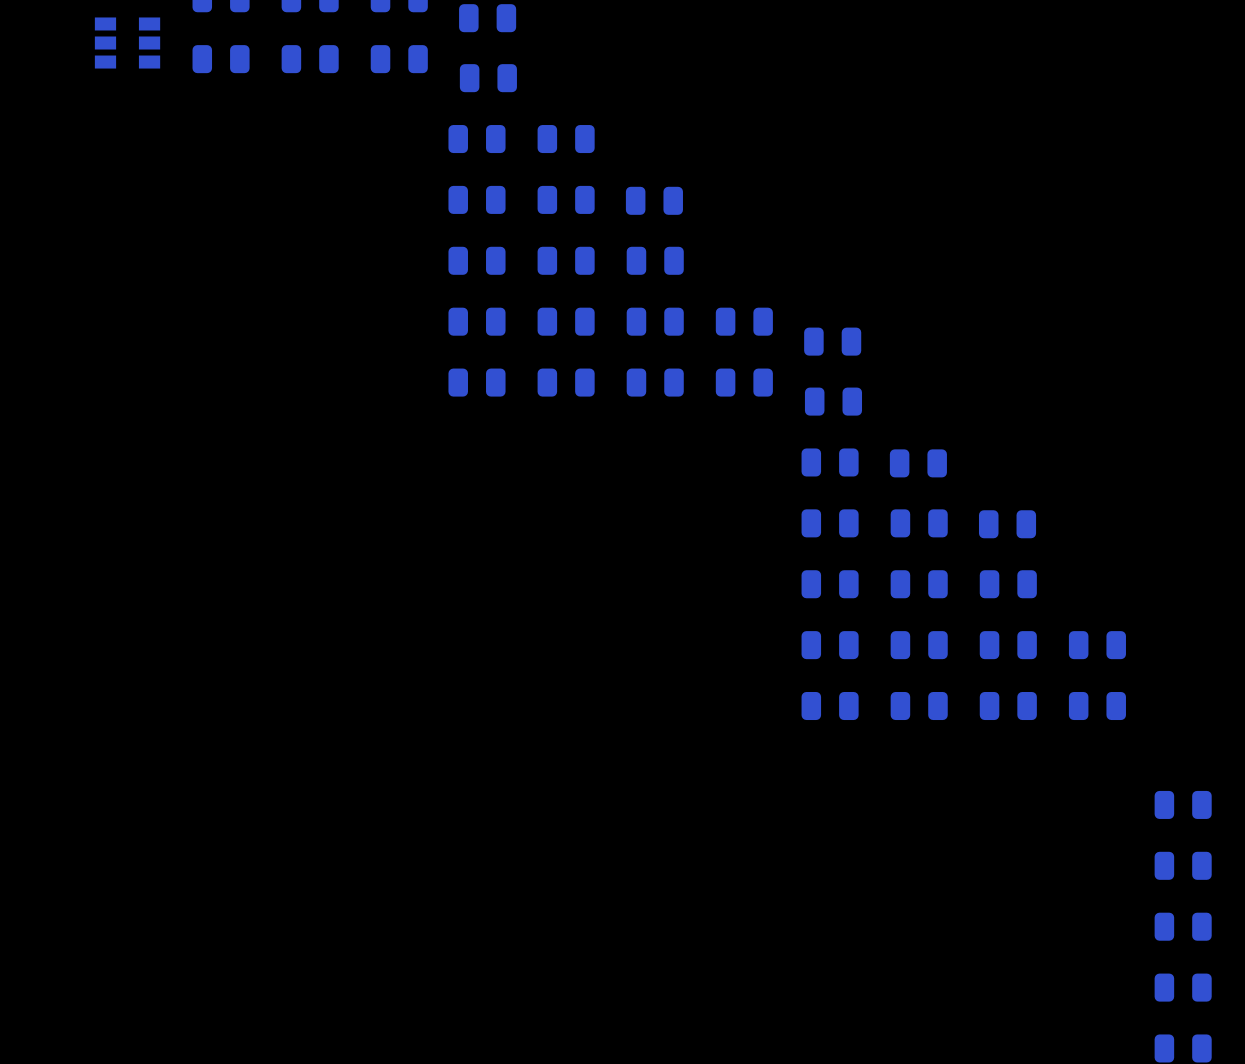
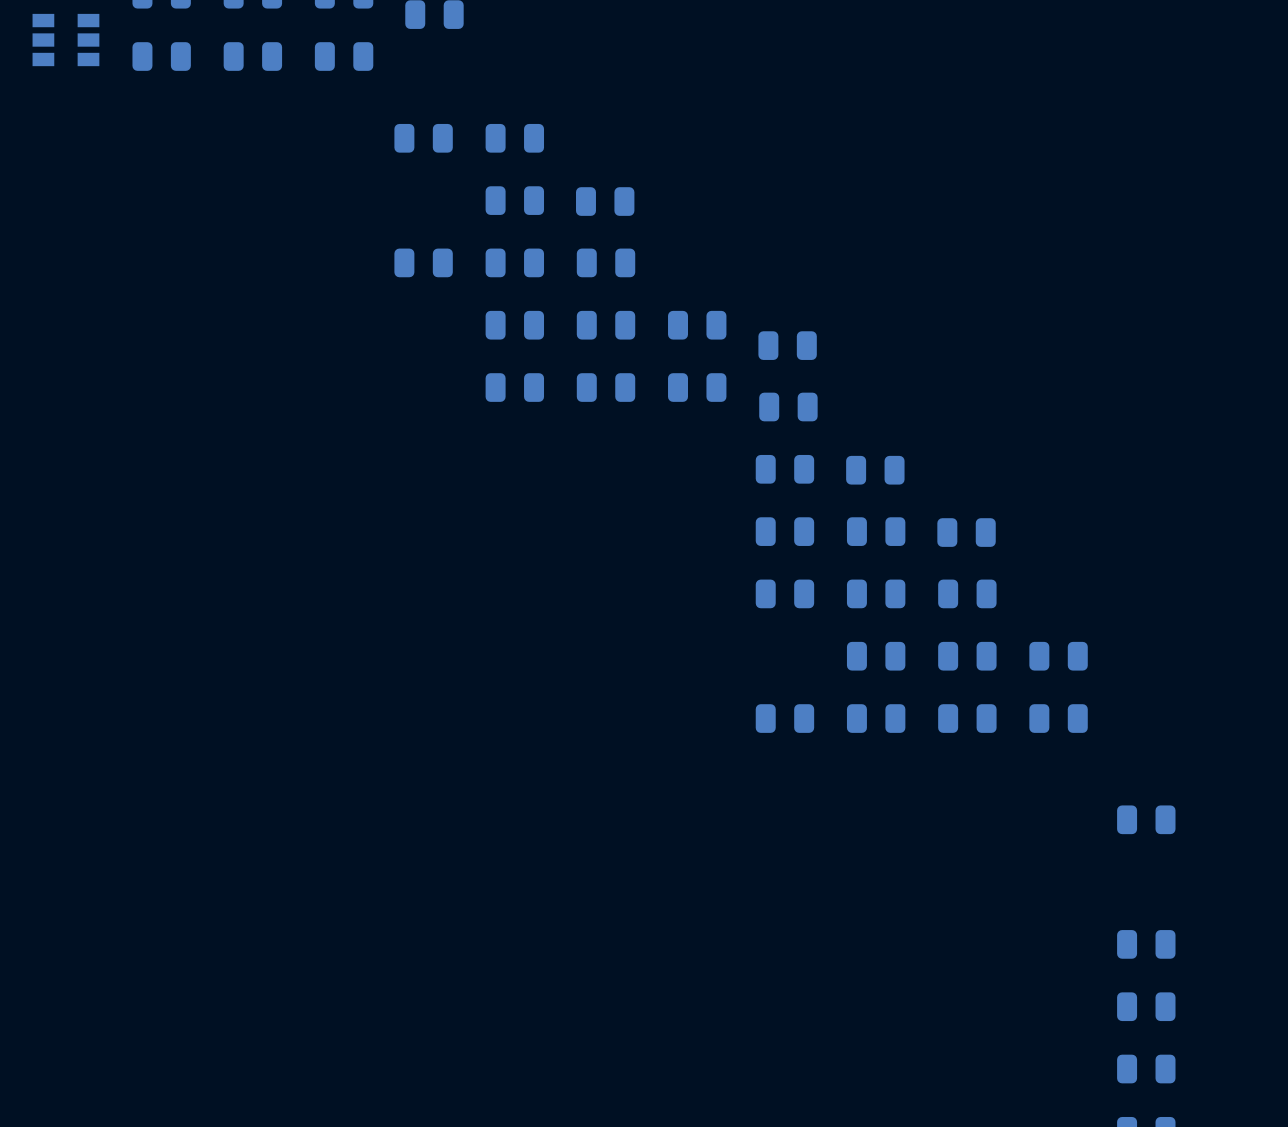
part: (488, 78) -> none
part: (476, 199) -> none
part: (476, 321) -> none
part: (476, 382) -> none
part: (830, 645) -> none
part: (1183, 865) -> none

